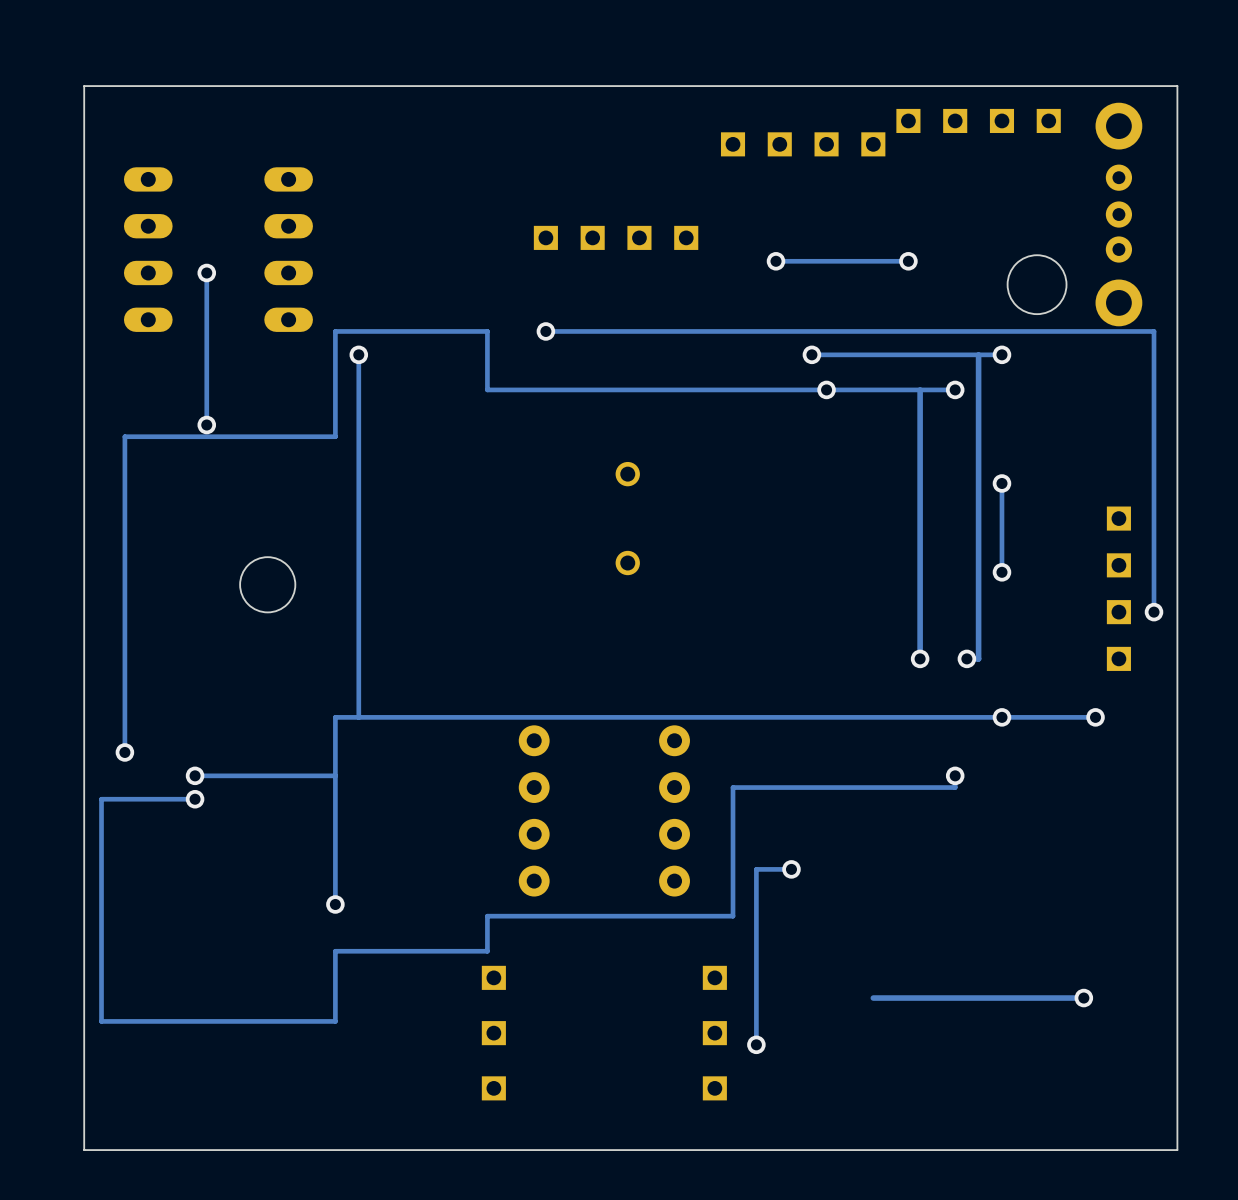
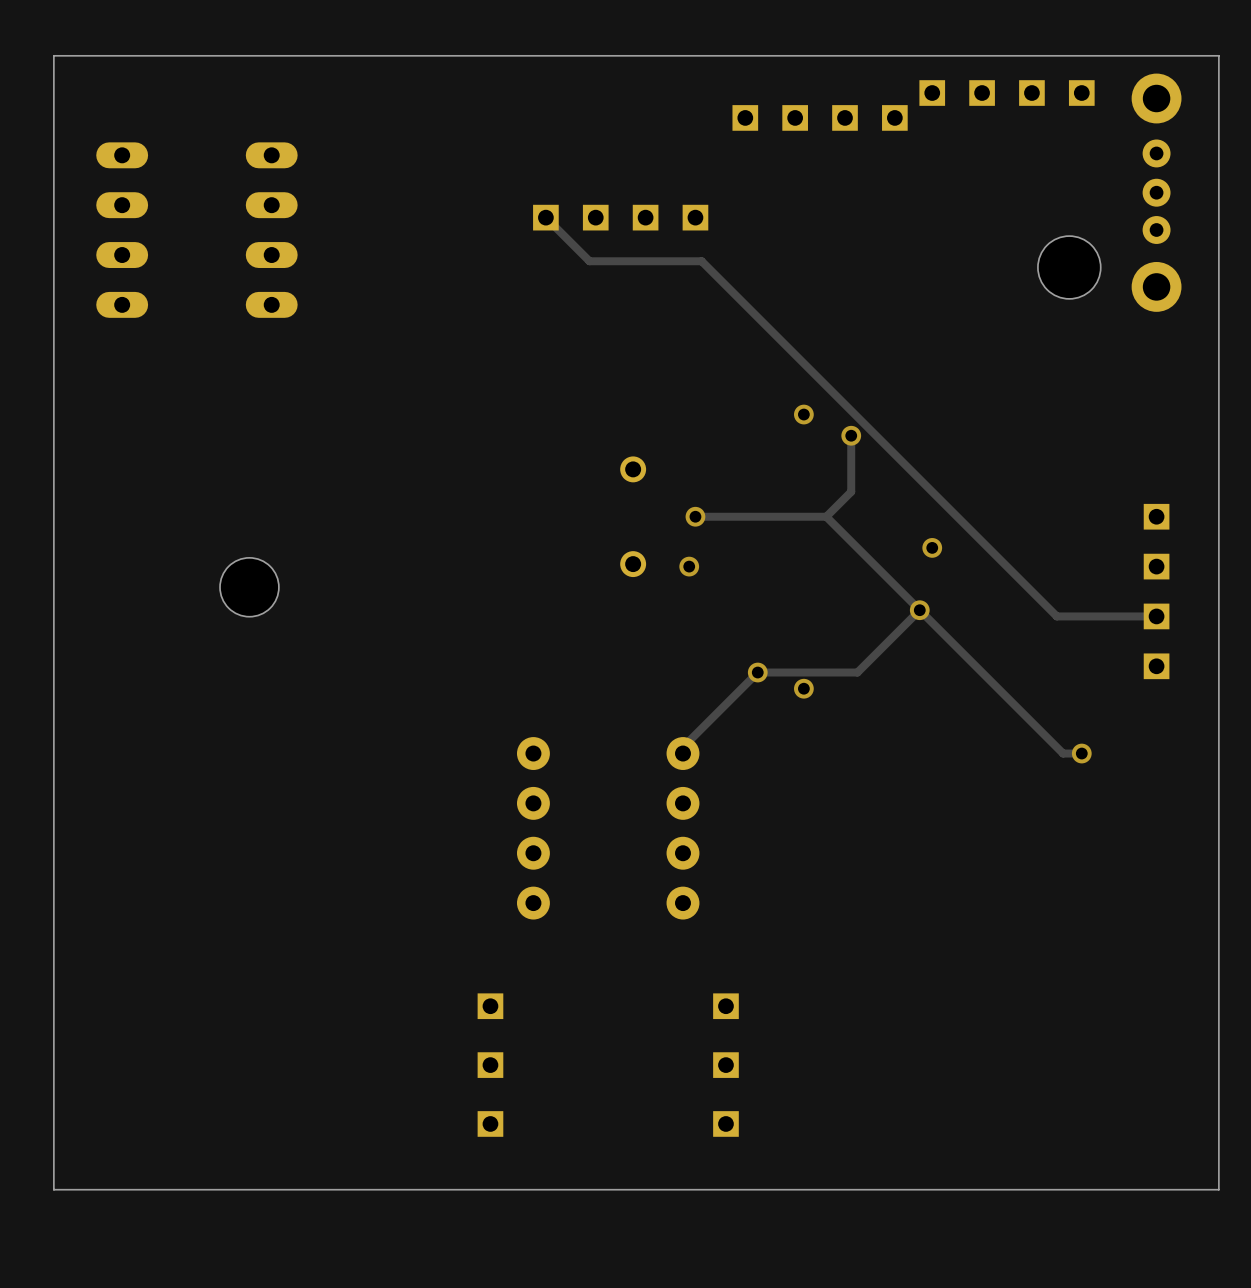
track: none -> (545, 217) (589, 261) (701, 261) (1056, 616) (1156, 616)
via: (776, 261) -> none
track: (908, 261) (776, 261) -> none
via: (908, 261) -> none
track: (206, 272) (206, 425) -> none
via: (206, 272) -> none
track: (545, 331) (1154, 331) (1154, 612) -> none
via: (545, 331) -> none
track: (358, 354) (358, 717) -> none
via: (358, 354) -> none
via: (811, 354) -> none
track: (978, 354) (978, 658) (966, 658) -> none
track: (1001, 354) (811, 354) -> none
via: (1001, 354) -> none
via: (826, 389) -> none
track: (920, 389) (920, 658) -> none
track: (955, 389) (487, 389) (487, 331) (335, 331) (335, 436) (124, 436) (124, 752) -> none
via: (955, 389) -> none
via: none -> (803, 414)
via: (206, 425) -> none
track: none -> (851, 435) (851, 491) (826, 516)
via: none -> (851, 435)
track: (1001, 483) (1001, 572) -> none
via: (1001, 483) -> none
via: none -> (695, 516)
track: none -> (826, 516) (1063, 753) (1081, 753)
track: none -> (826, 516) (695, 516)
via: none -> (932, 547)
via: none -> (689, 566)
via: (1001, 572) -> none
track: none -> (919, 610) (857, 672) (757, 672) (682, 747) (682, 753)
via: none -> (919, 610)
via: (1154, 612) -> none
via: (920, 658) -> none
via: (966, 658) -> none
via: none -> (757, 672)
via: none -> (803, 688)
via: (1001, 717) -> none
track: (1095, 717) (335, 717) (335, 904) -> none
via: (1095, 717) -> none
via: none -> (1081, 753)
via: (124, 752) -> none
via: (195, 775) -> none
track: (335, 775) (195, 775) -> none
track: (955, 775) (955, 787) (733, 787) (733, 916) (487, 916) (487, 951) (335, 951) (335, 1021) (101, 1021) (101, 799) (195, 799) -> none
via: (955, 775) -> none
via: (195, 799) -> none
track: (791, 869) (756, 869) (756, 1044) -> none
via: (791, 869) -> none
via: (335, 904) -> none
track: (1083, 998) (873, 998) -> none
via: (1083, 998) -> none
via: (756, 1044) -> none

